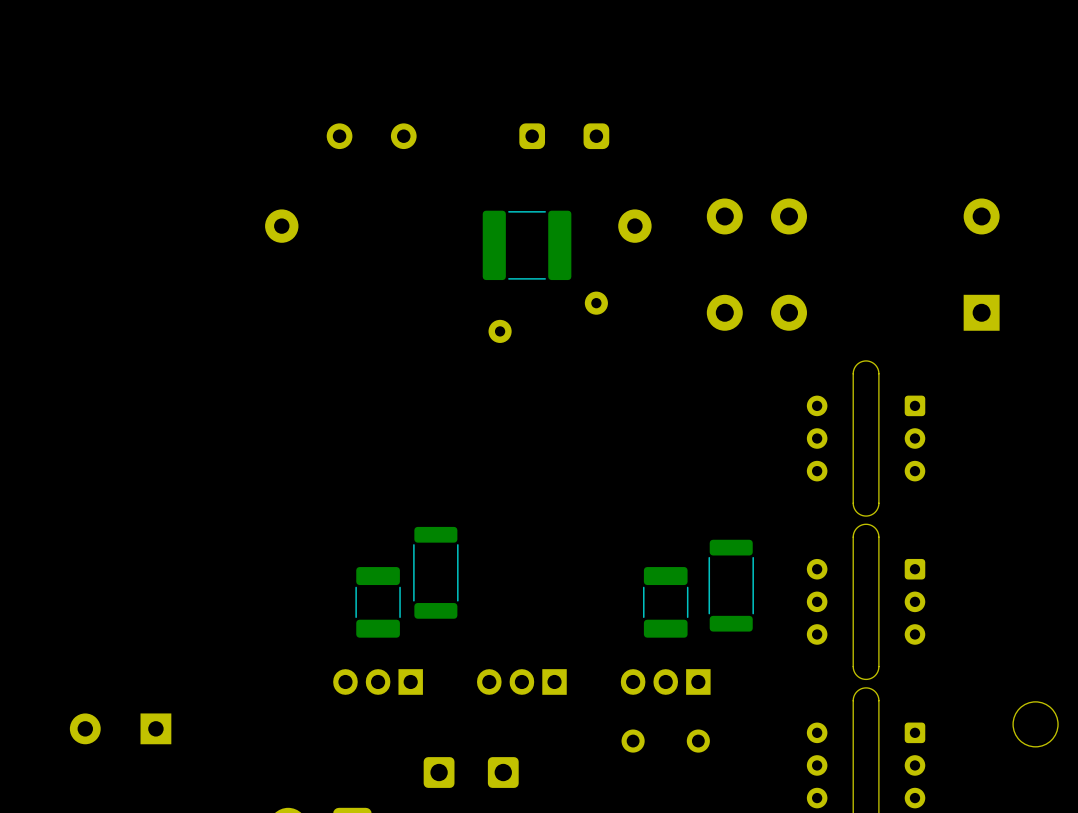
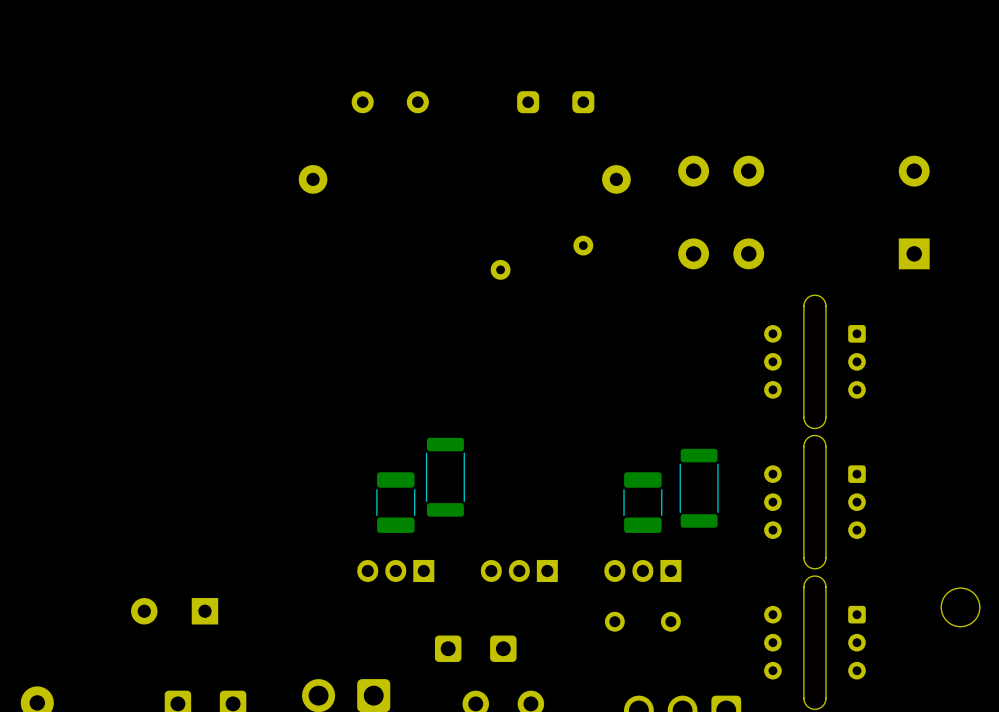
part: (527, 245) -> none

